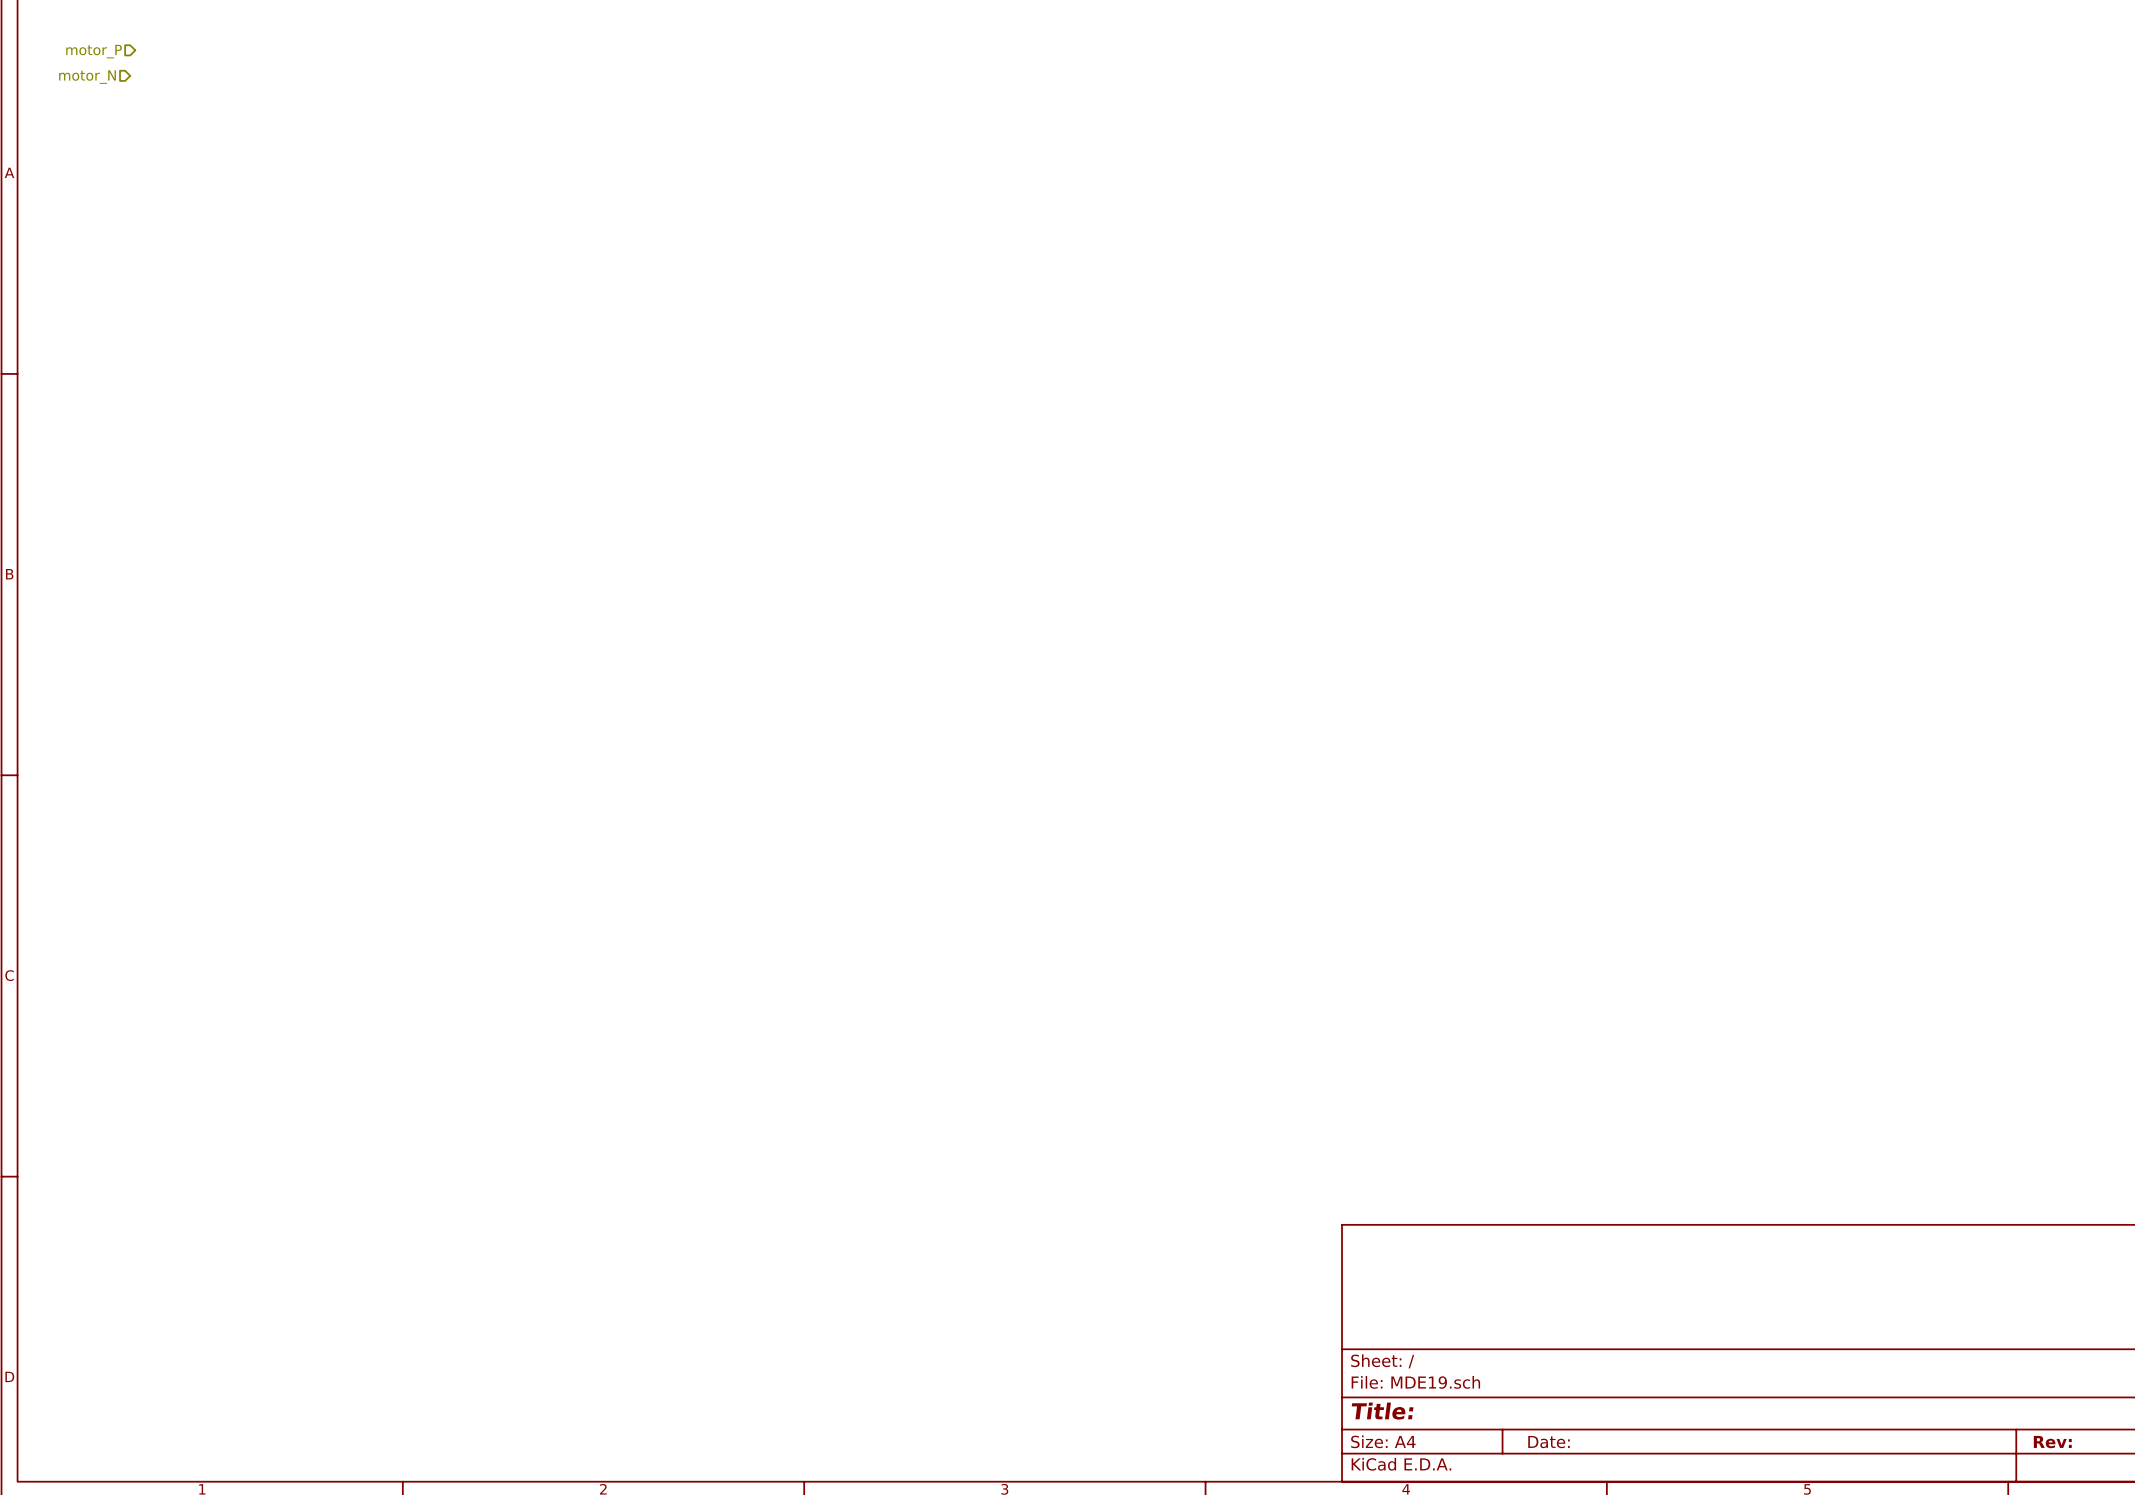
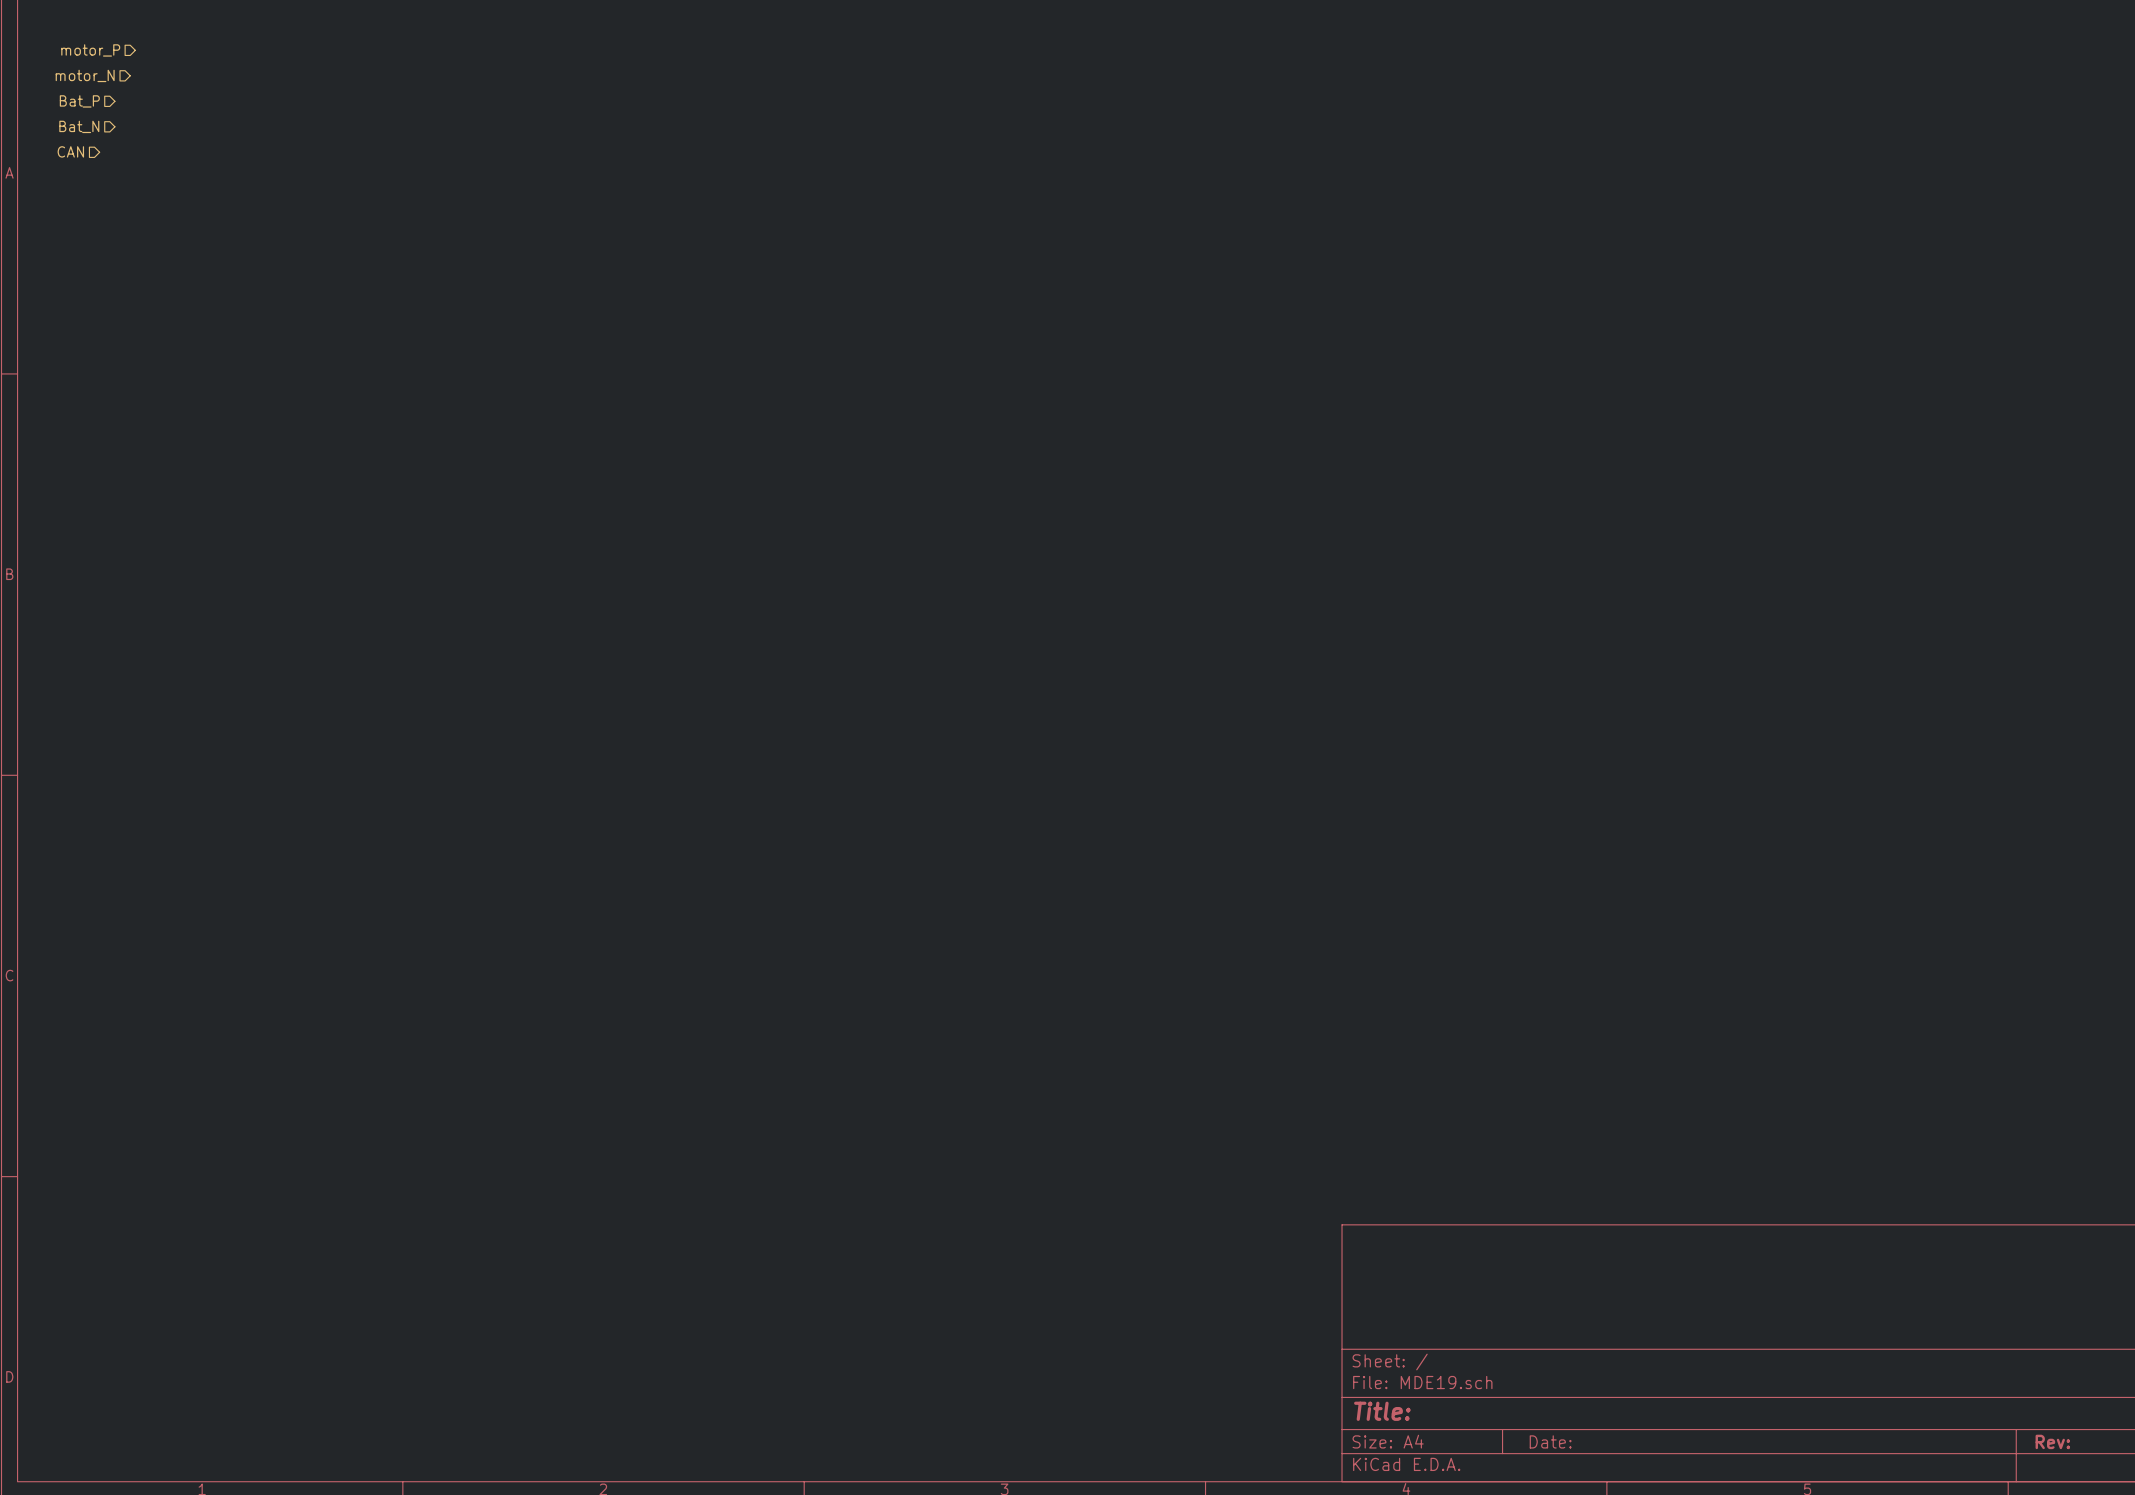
hierarchical label: none -> Bat_P (79, 101)
hierarchical label: none -> Bat_N (79, 126)
hierarchical label: none -> CAN (70, 151)

